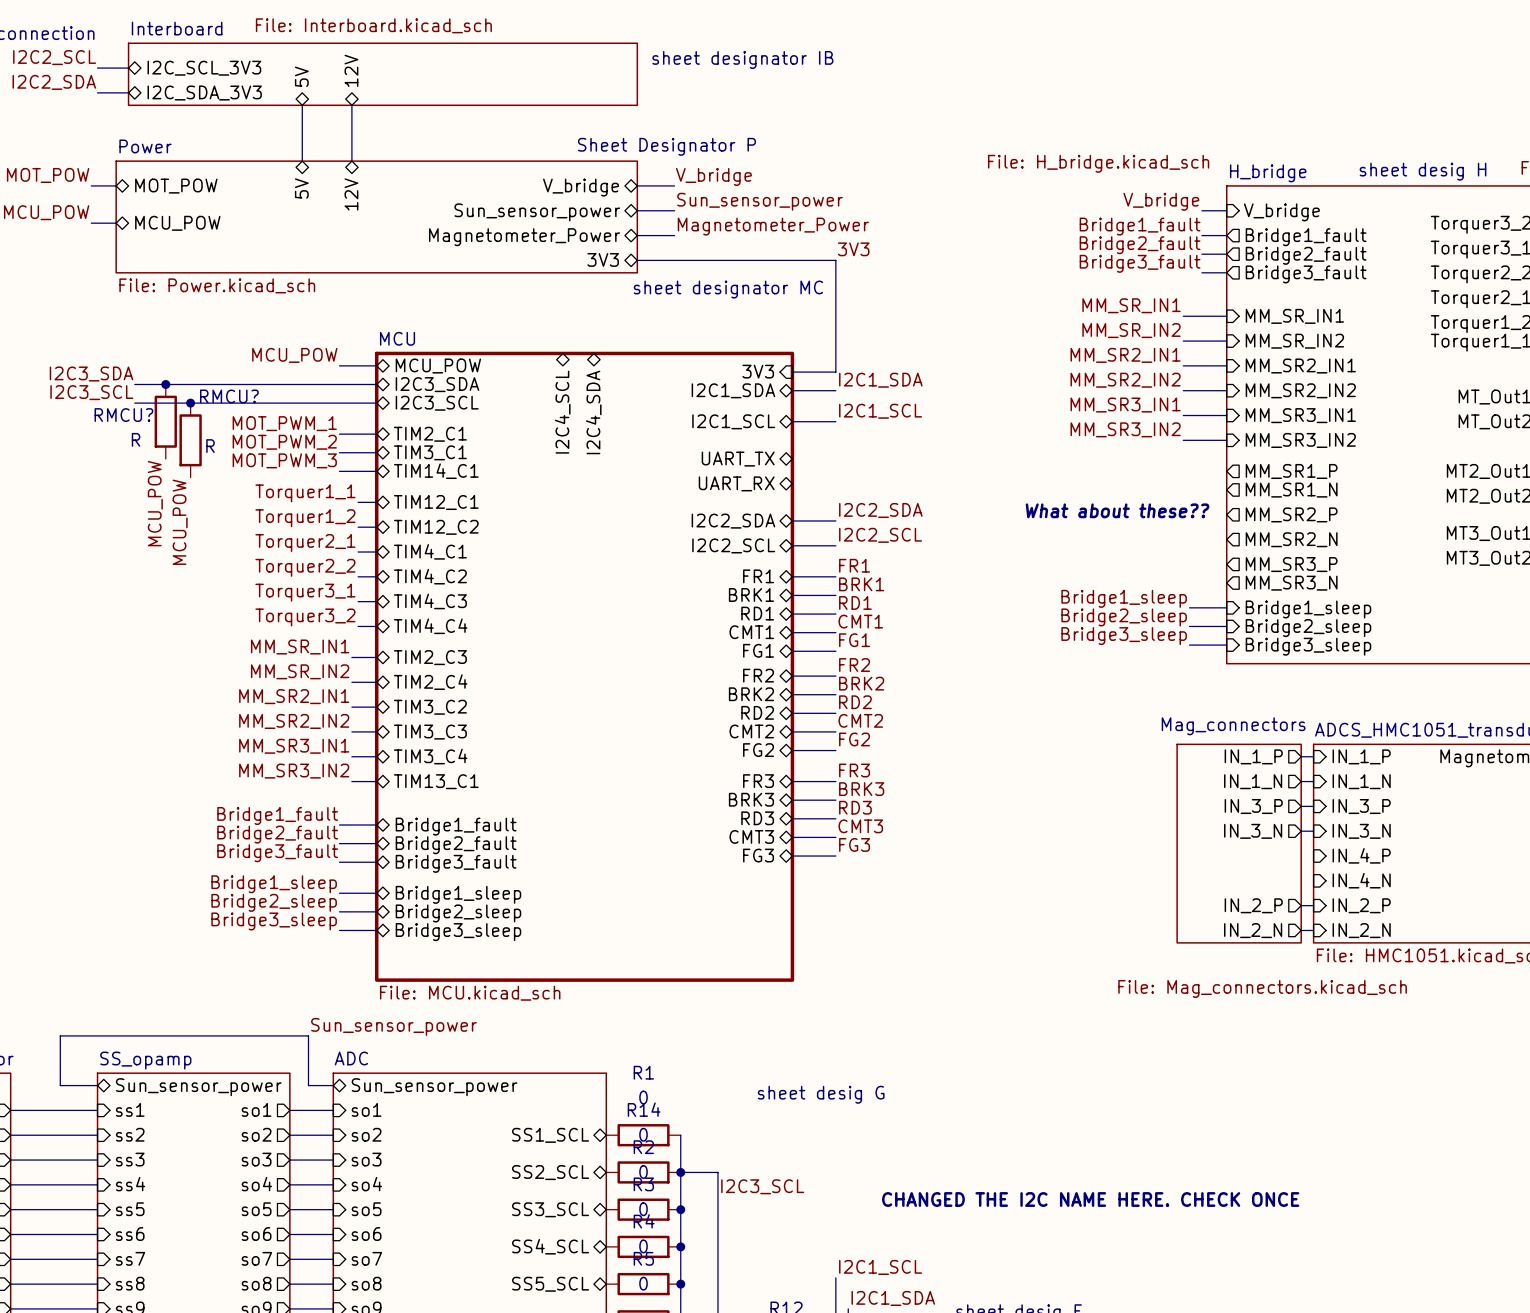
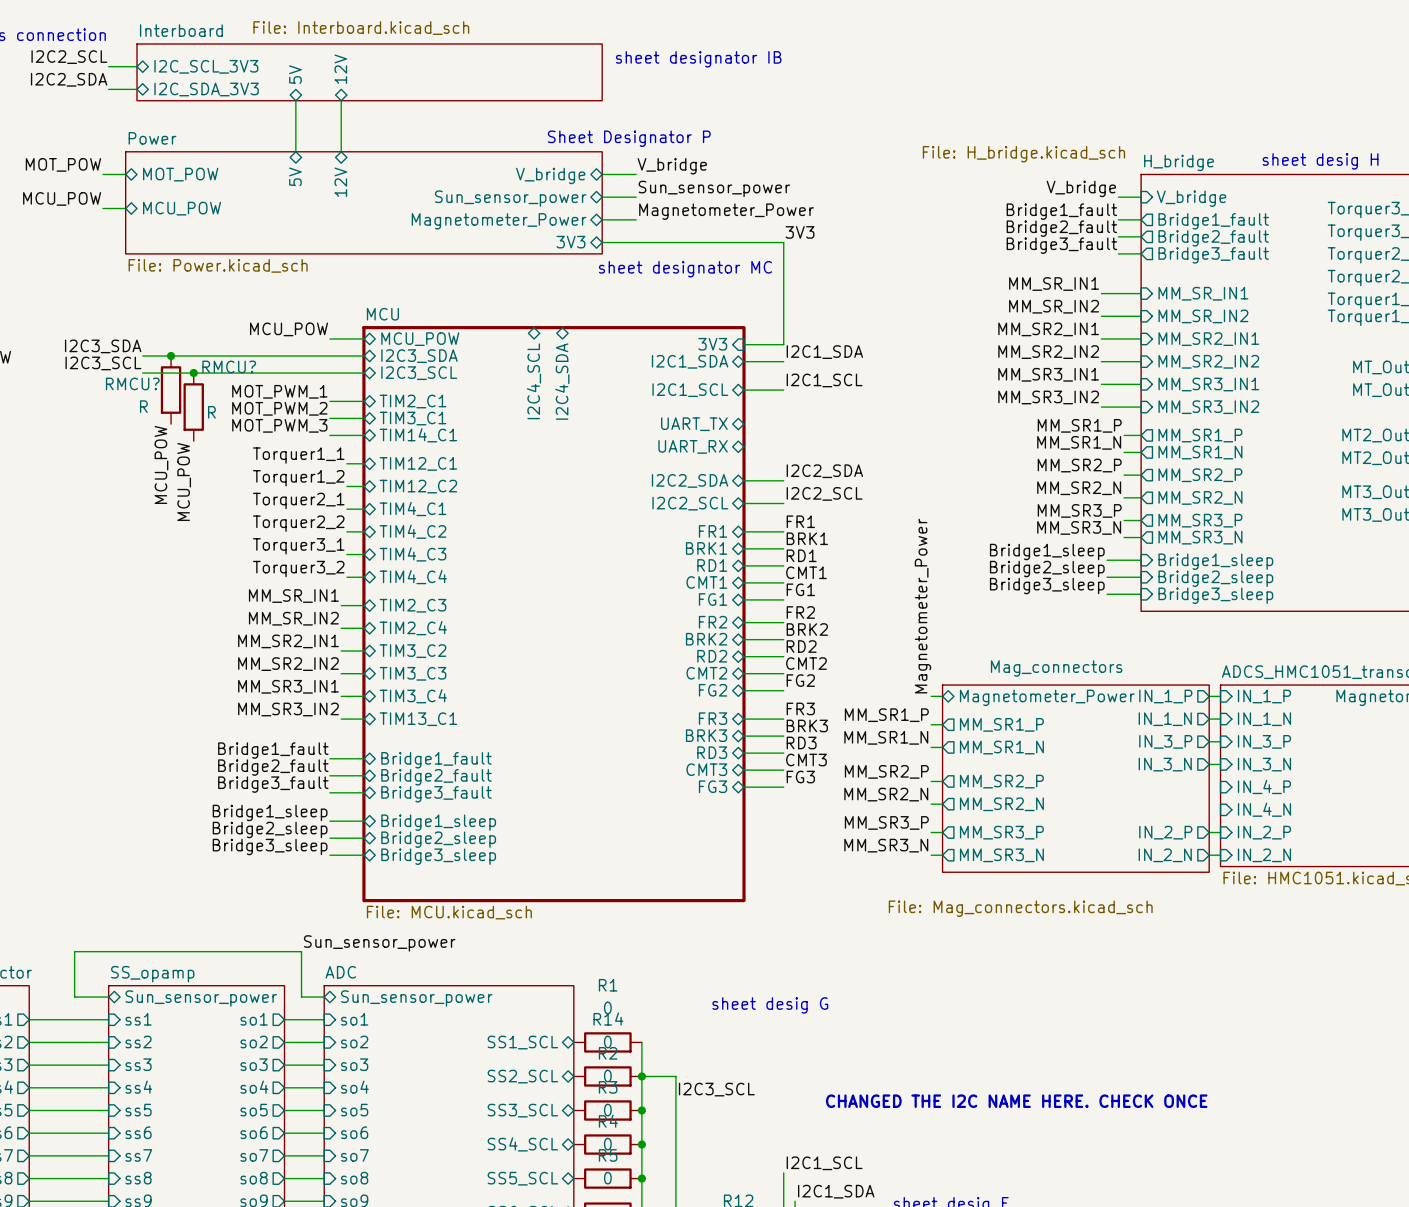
label: none -> MM_SR1_P (1079, 425)
wire: none -> (1124, 435) (1141, 435)
label: none -> MM_SR1_N (1079, 442)
wire: none -> (1124, 452) (1141, 452)
label: none -> MM_SR2_P (1079, 465)
text: What about these?? (1117, 510) -> none
wire: none -> (1124, 475) (1141, 475)
label: none -> MM_SR2_N (1079, 488)
wire: none -> (1124, 497) (1141, 497)
label: none -> MM_SR3_P (1079, 510)
wire: none -> (1124, 520) (1141, 520)
label: none -> MM_SR3_N (1079, 527)
wire: none -> (1124, 537) (1141, 537)
label: none -> Magnetometer_Power (922, 606)
wire: none -> (931, 696) (942, 696)
sheet pin: none -> Magnetometer_Power (1047, 697)
label: none -> MM_SR1_P (886, 715)
wire: none -> (931, 724) (942, 724)
sheet pin: none -> MM_SR1_P (1001, 724)
label: none -> MM_SR1_N (886, 737)
wire: none -> (931, 747) (942, 747)
sheet pin: none -> MM_SR1_N (1001, 747)
label: none -> MM_SR2_P (886, 771)
sheet Mag_connectors: File: Mag_connectors.kicad_sch (1239, 843) -> none
sheet Mag_connectors: none -> File: Mag_connectors.kicad_sch (1075, 778)
wire: none -> (931, 781) (942, 781)
sheet pin: none -> MM_SR2_P (1001, 781)
label: none -> MM_SR2_N (886, 794)
wire: none -> (931, 804) (942, 804)
sheet pin: none -> MM_SR2_N (1001, 804)
label: none -> MM_SR3_P (886, 822)
wire: none -> (931, 832) (942, 832)
sheet pin: none -> MM_SR3_P (1001, 832)
label: none -> MM_SR3_N (886, 845)
wire: none -> (931, 855) (942, 855)
sheet pin: none -> MM_SR3_N (1001, 855)

